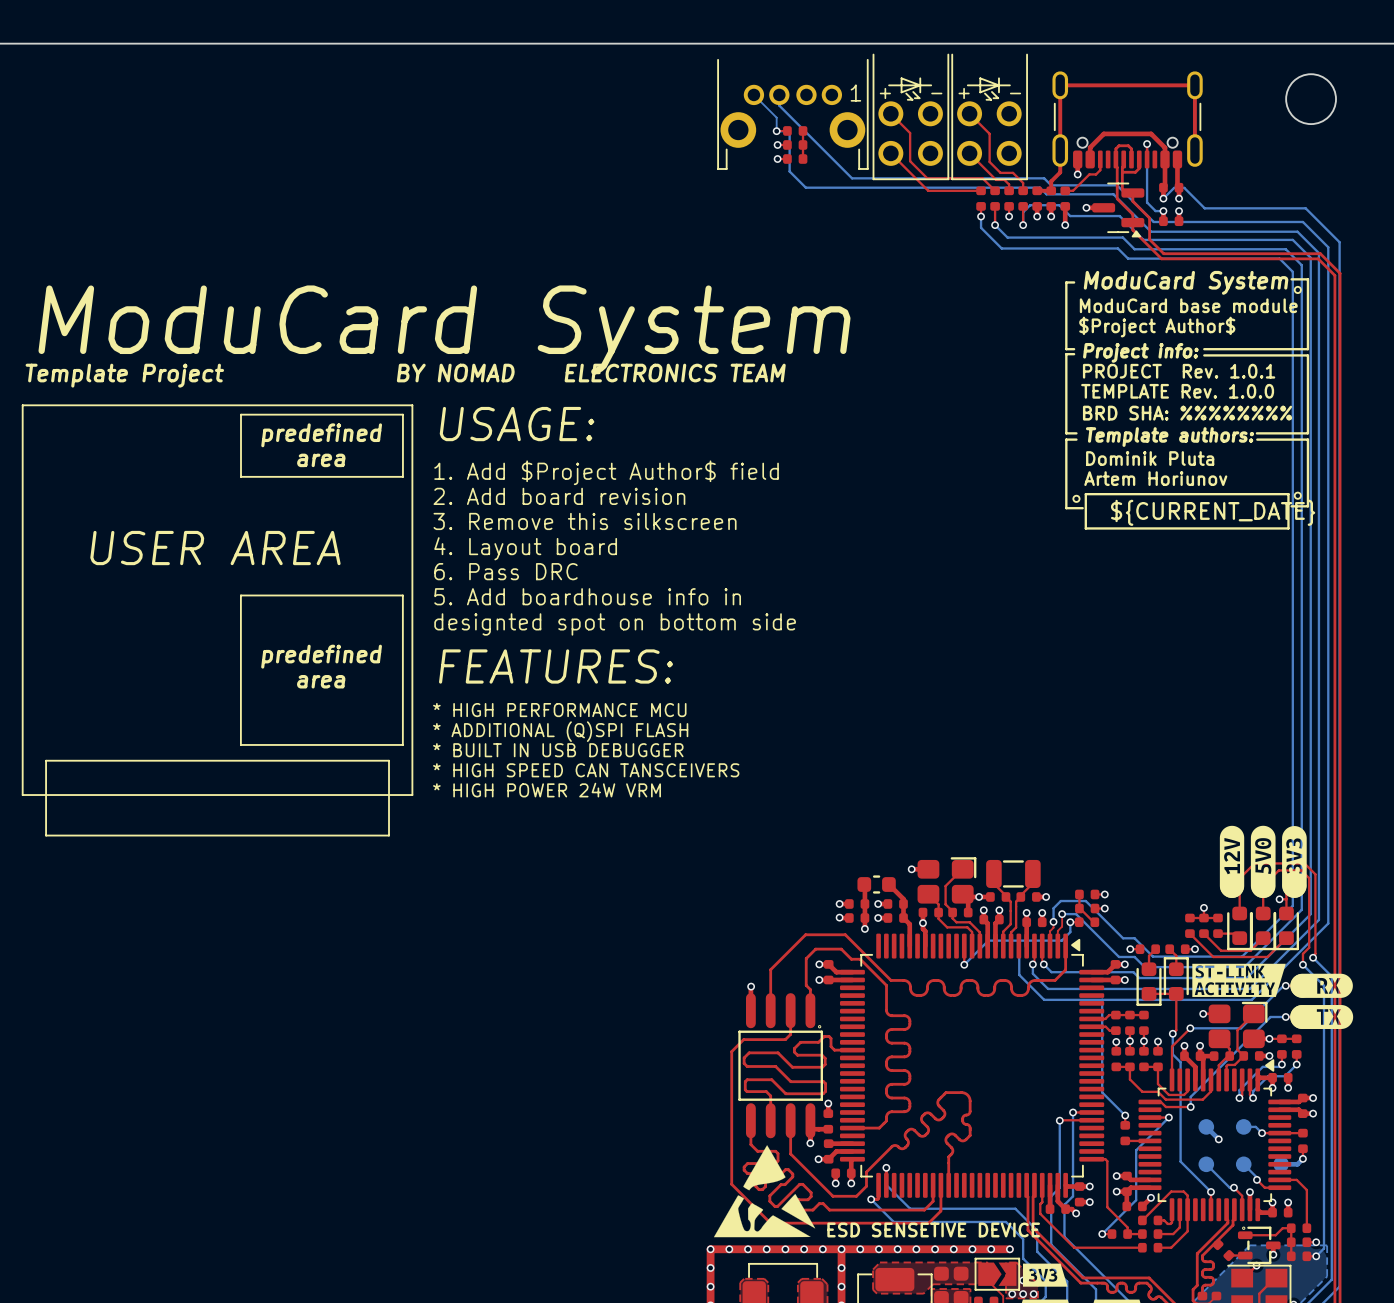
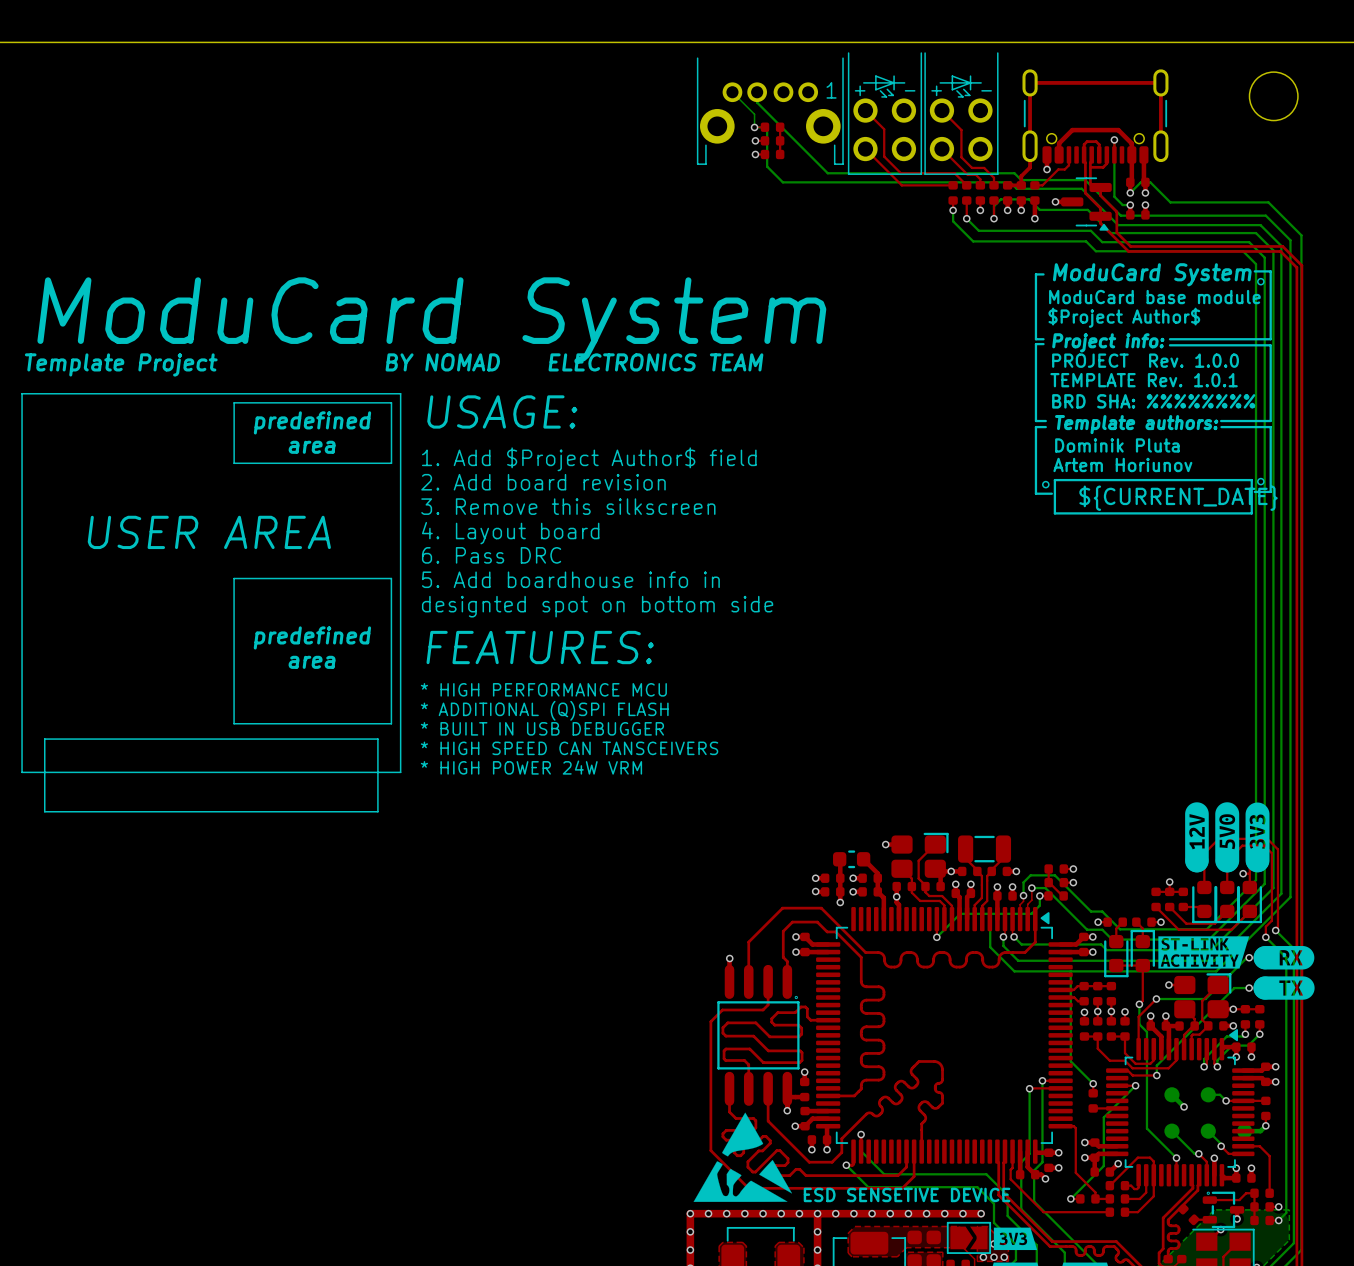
text: PROJECT Rev. 1.0.1 (1179, 371) -> PROJECT Rev. 1.0.0 (1145, 360)
text: TEMPLATE Rev. 1.0.0 (1177, 391) -> TEMPLATE Rev. 1.0.1 (1144, 380)

